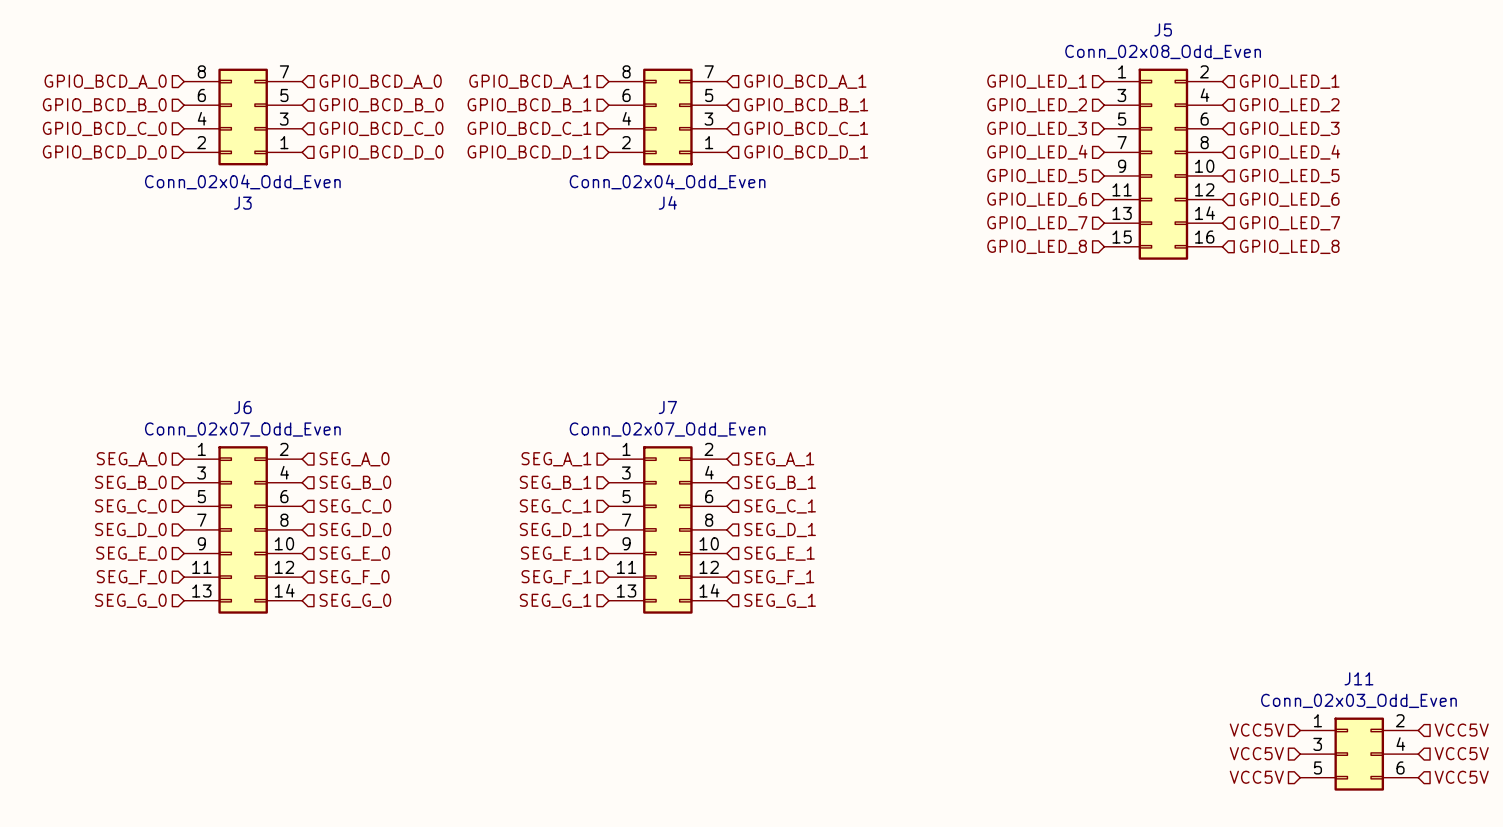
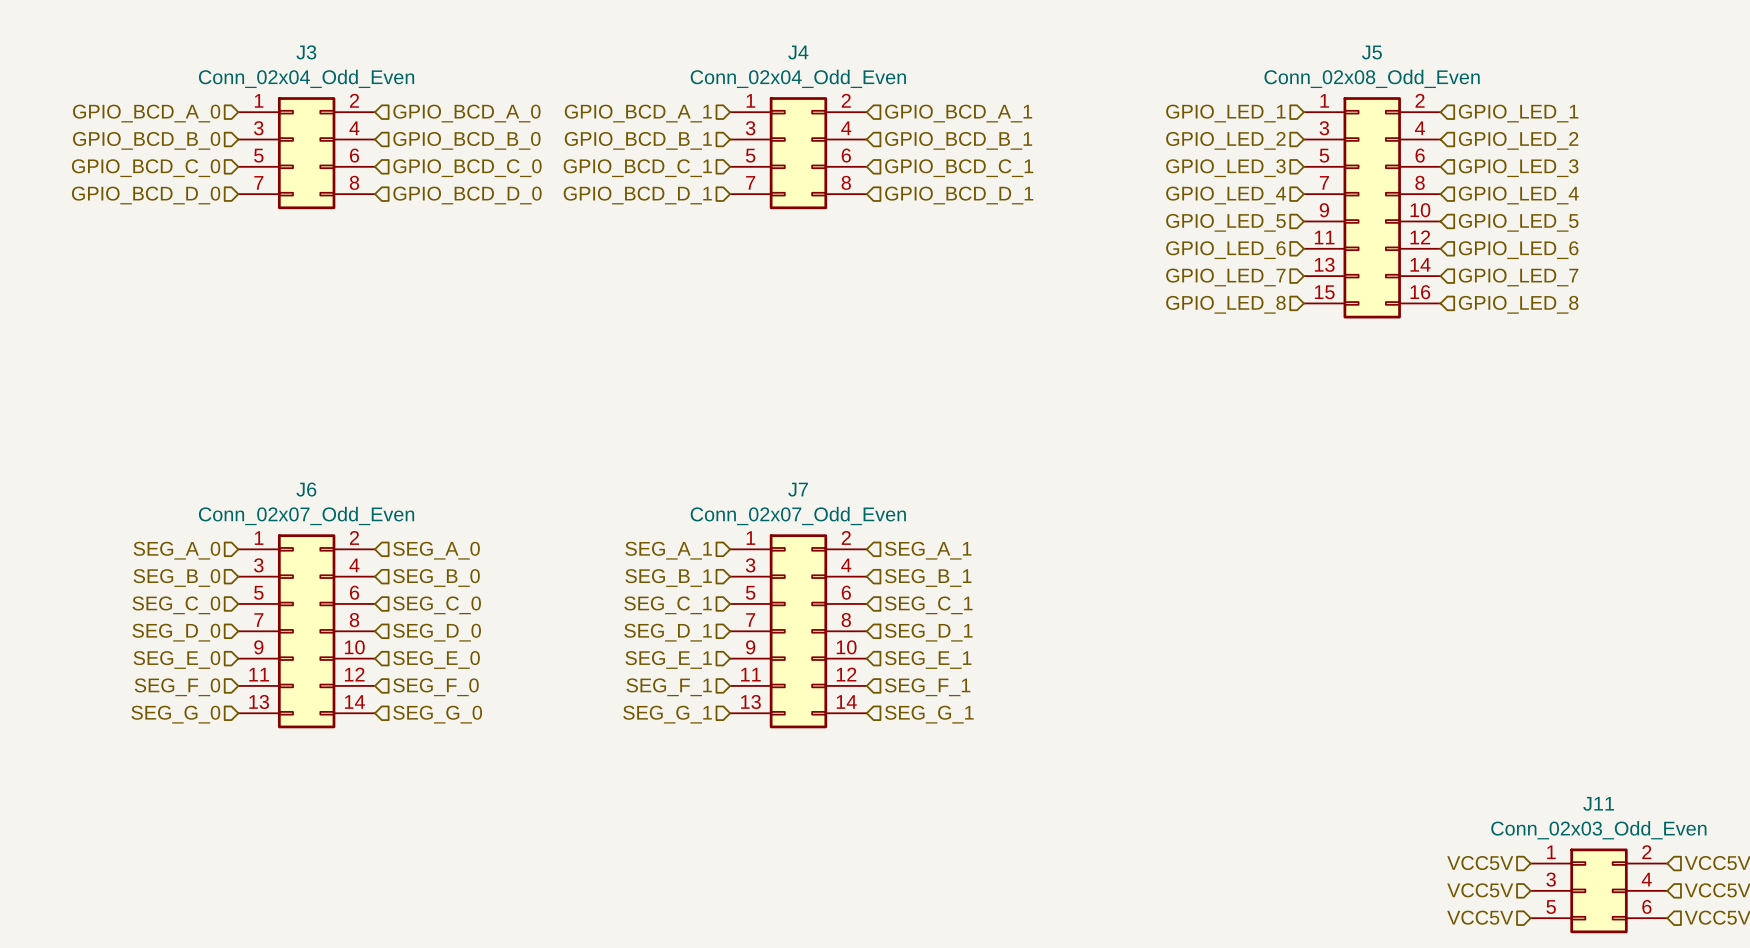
J3 rotation: 0° (243, 116) -> 180° (306, 153)
J4 rotation: 0° (667, 116) -> 180° (798, 153)

